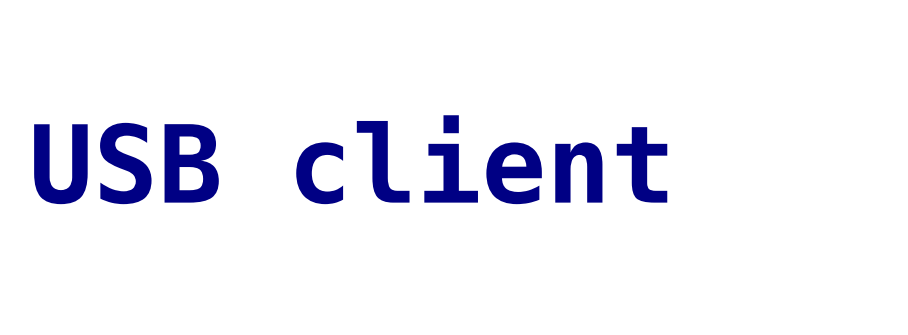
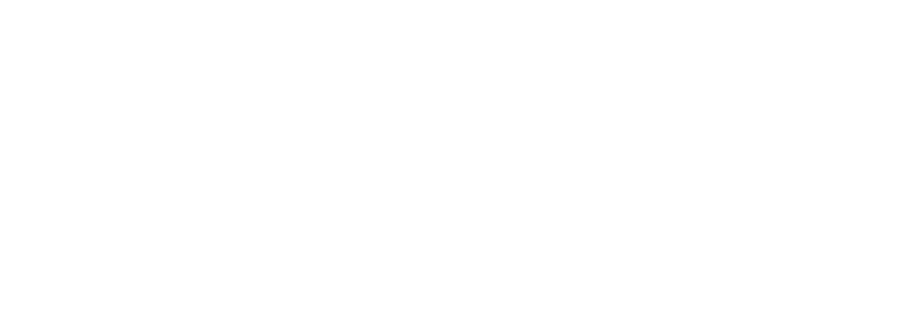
text: USB client (350, 159) -> none

